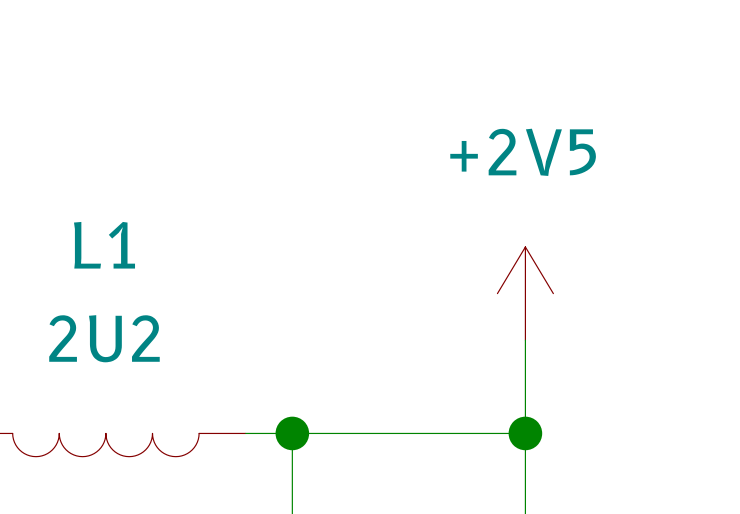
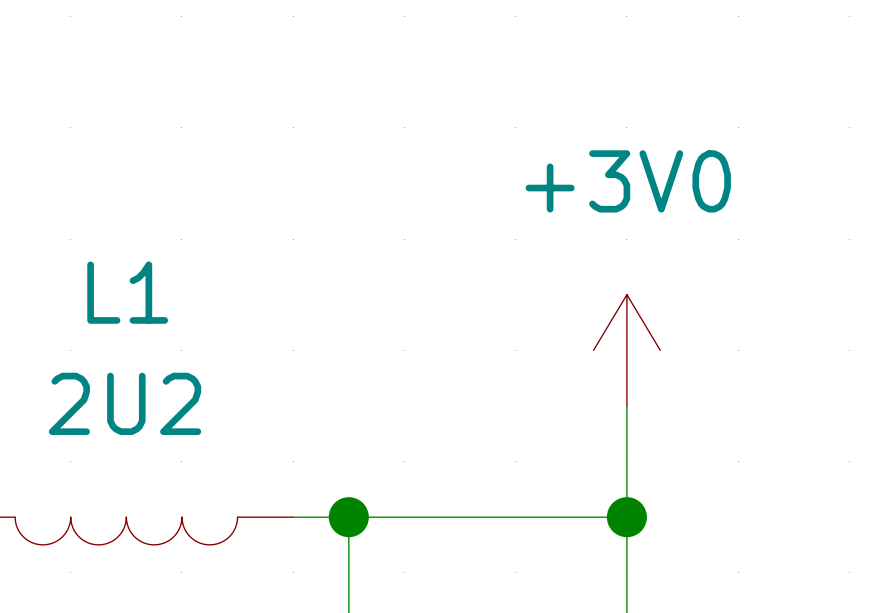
power symbol: +2V5 (525, 293) -> +3V0 (626, 350)

